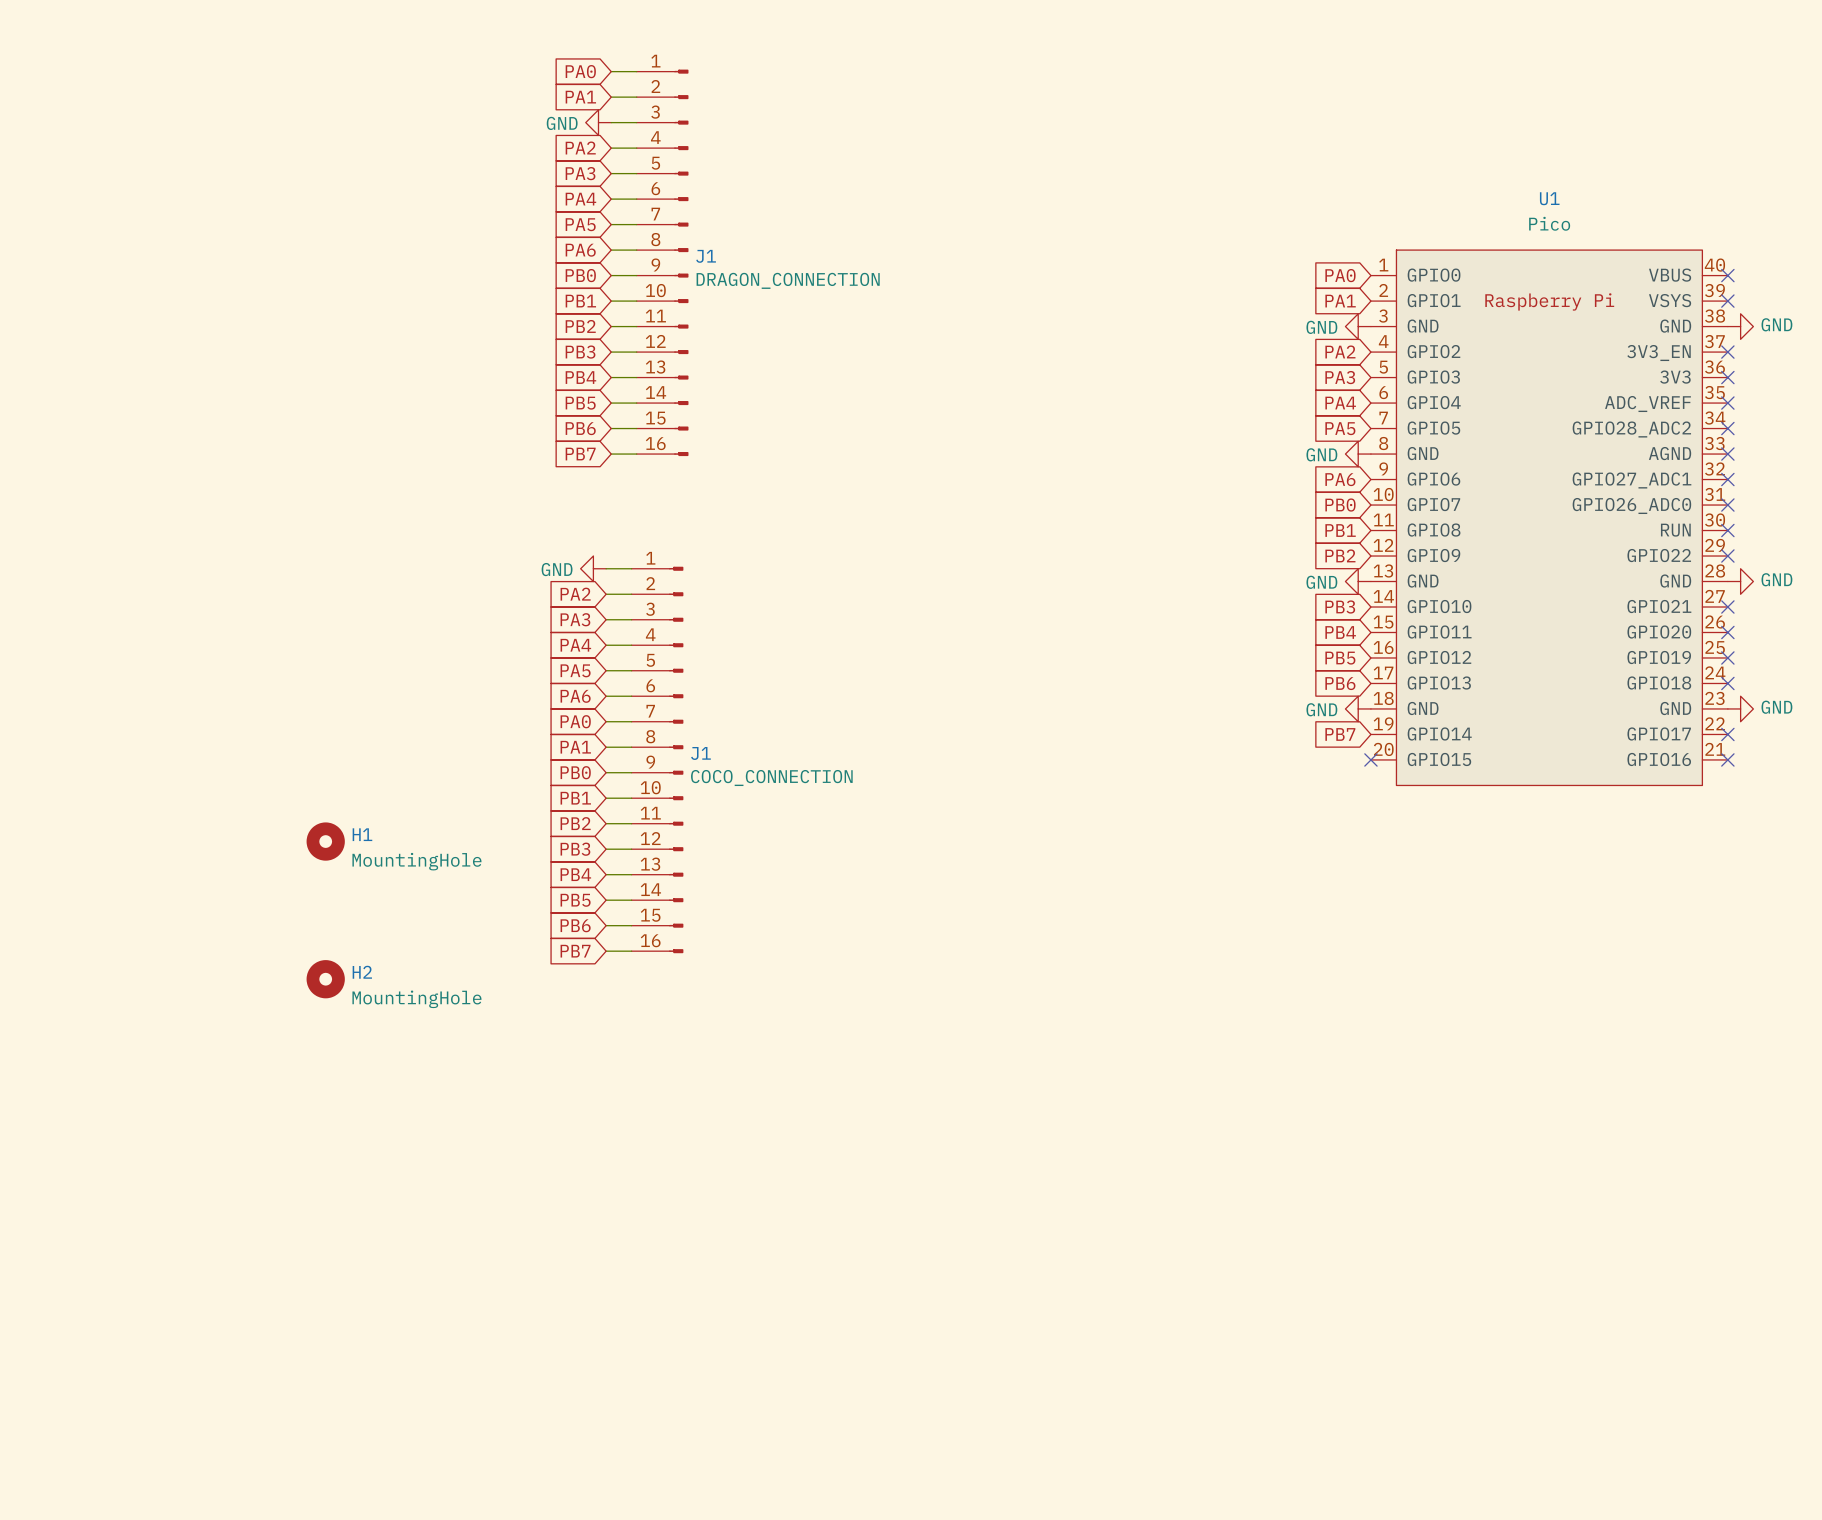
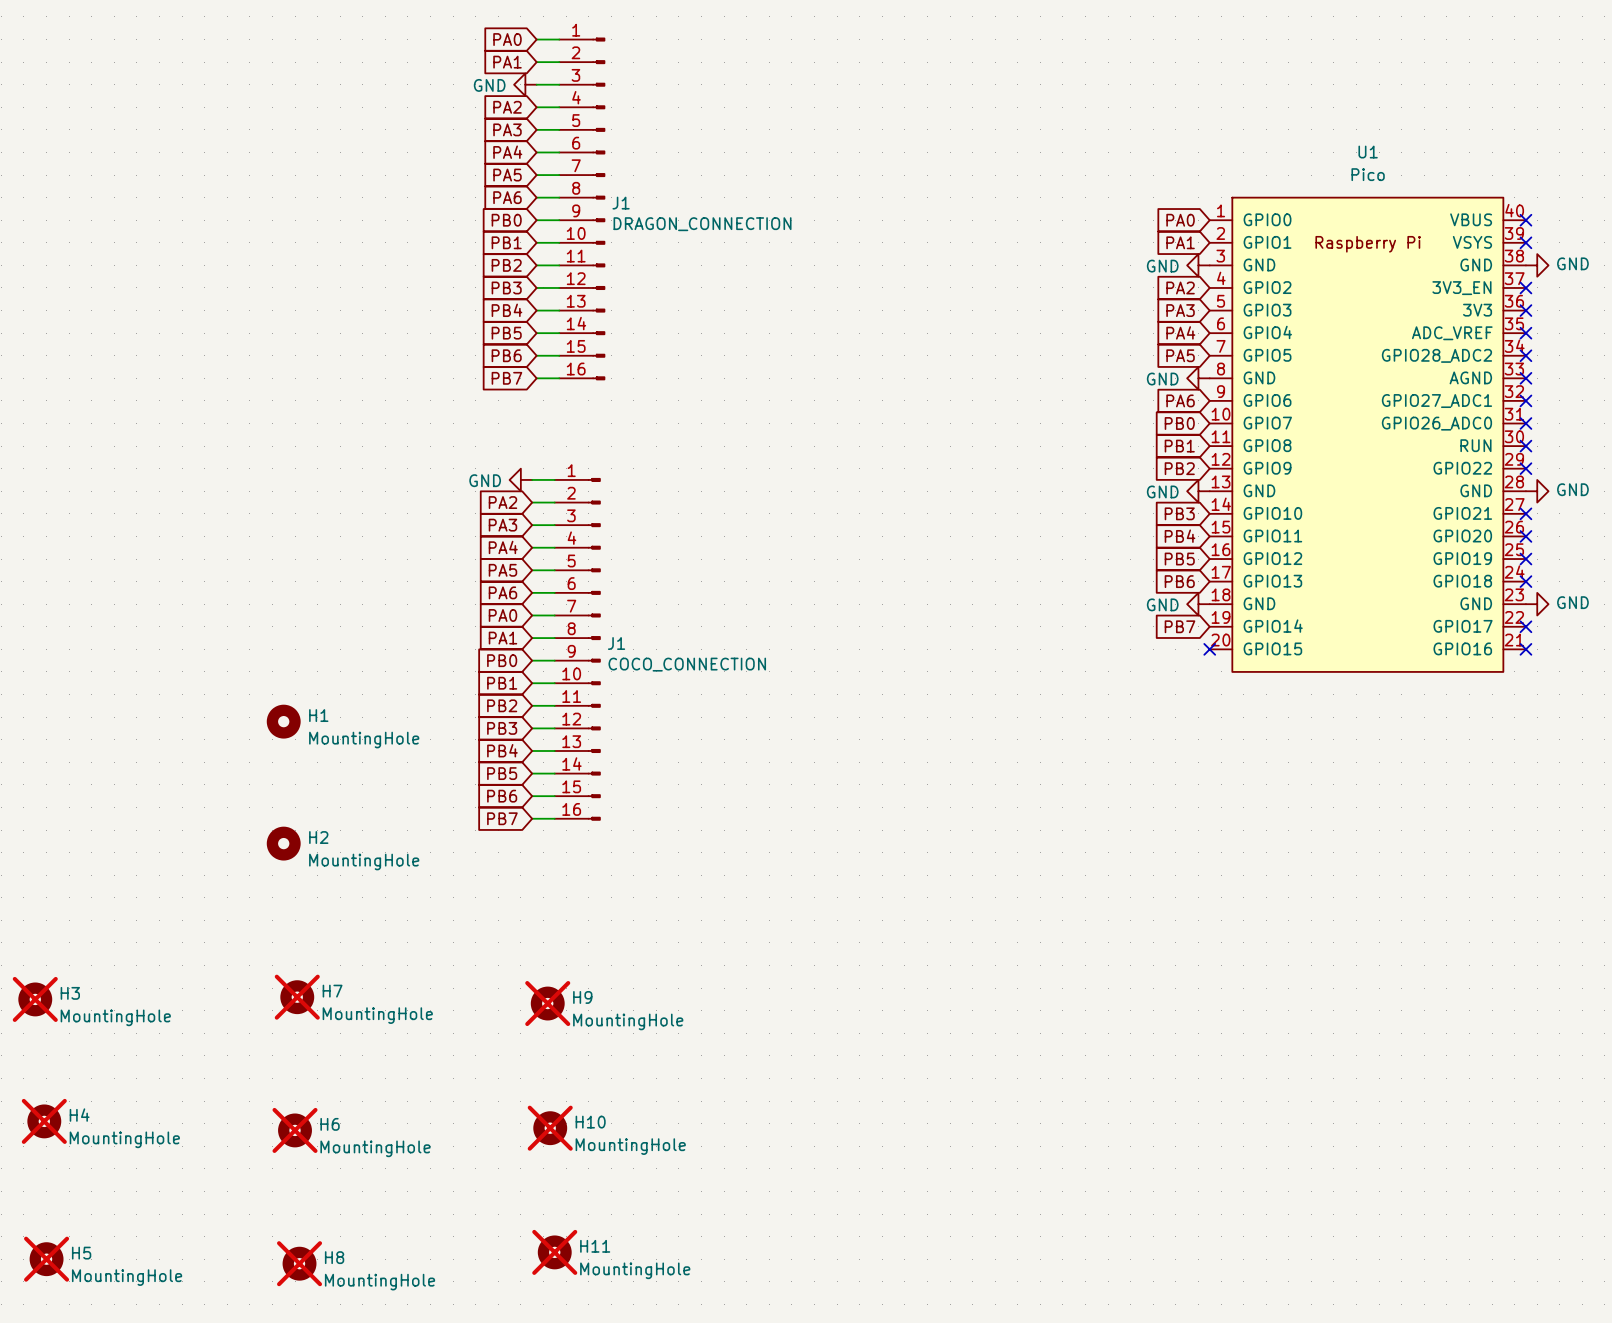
H7: none -> MountingHole (297, 997)
H3: none -> MountingHole (35, 999)
H9: none -> MountingHole (547, 1003)
H4: none -> MountingHole (44, 1121)
H10: none -> MountingHole (550, 1128)
H6: none -> MountingHole (295, 1130)
H11: none -> MountingHole (554, 1252)
H5: none -> MountingHole (46, 1259)
H8: none -> MountingHole (299, 1263)

